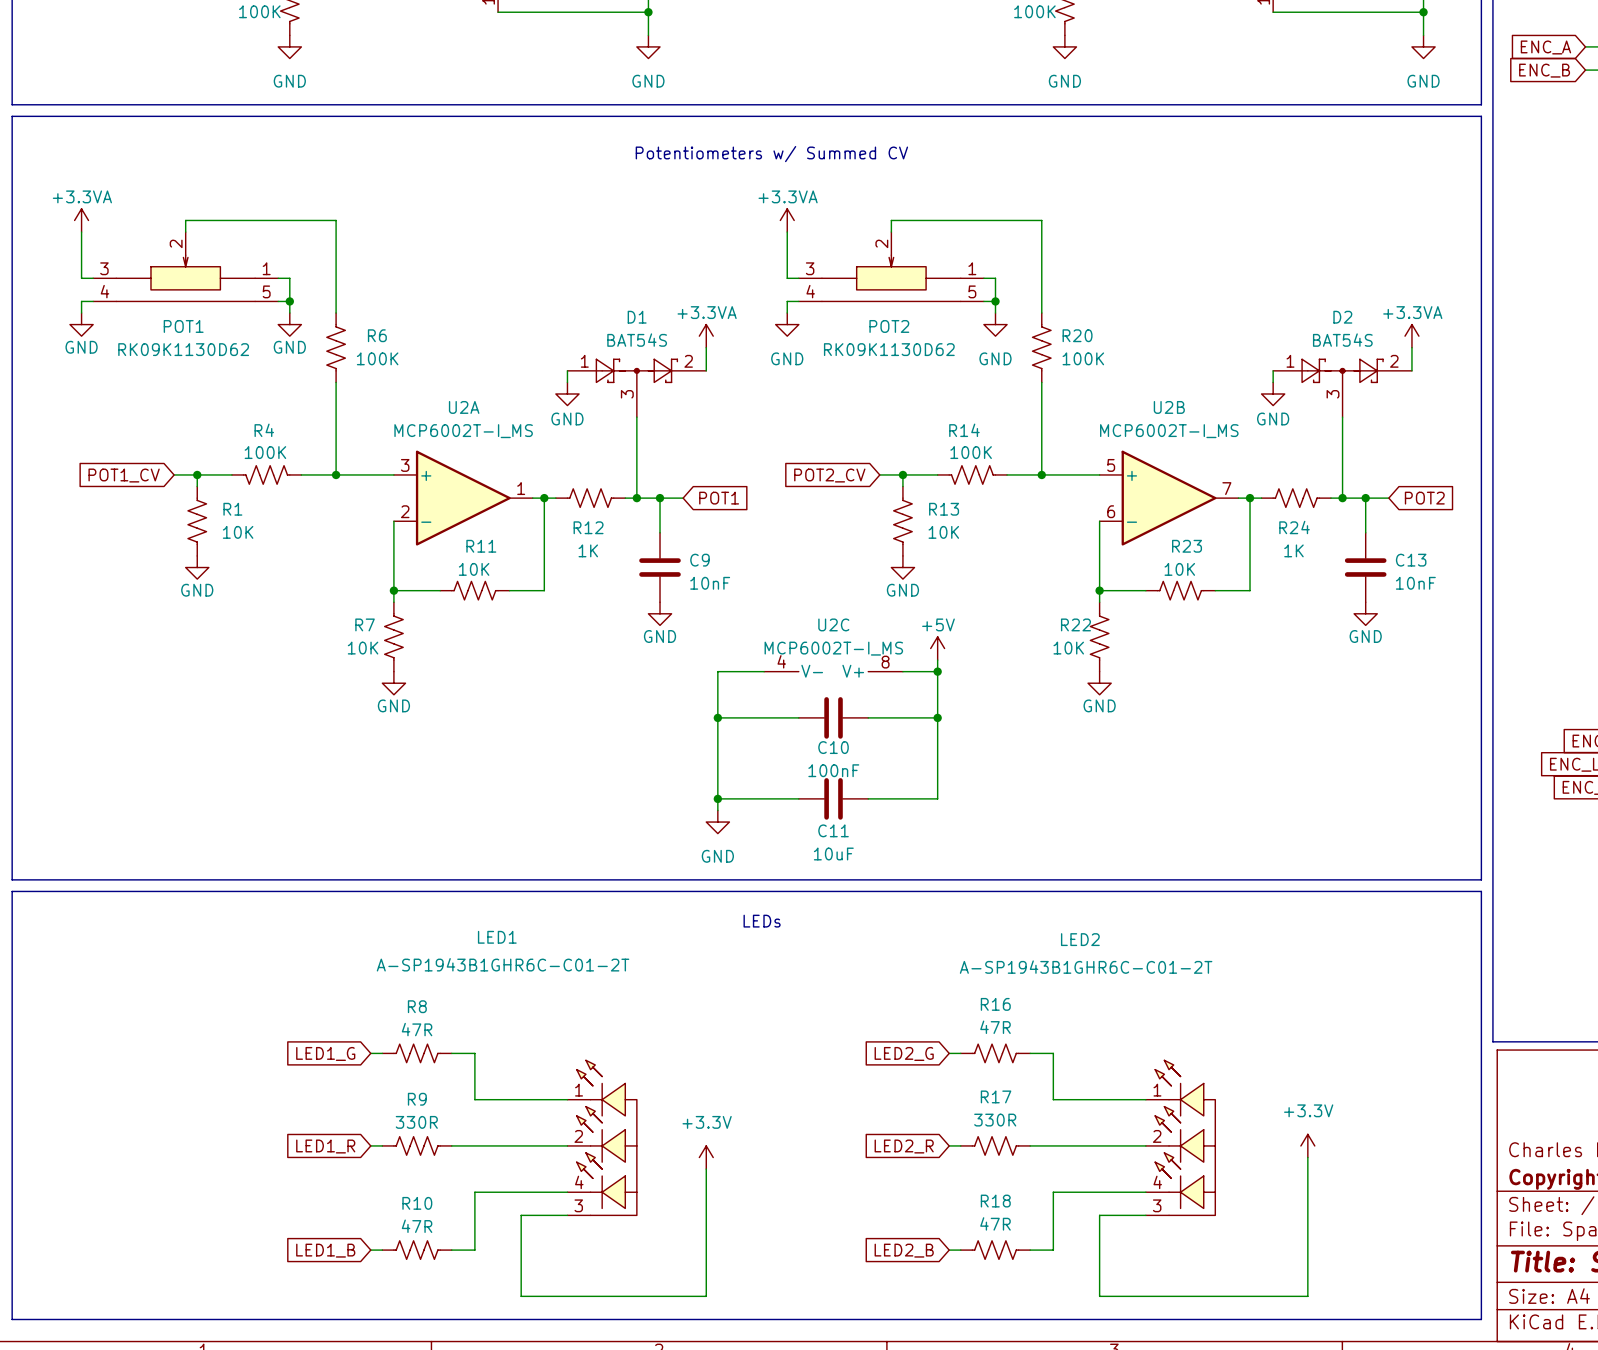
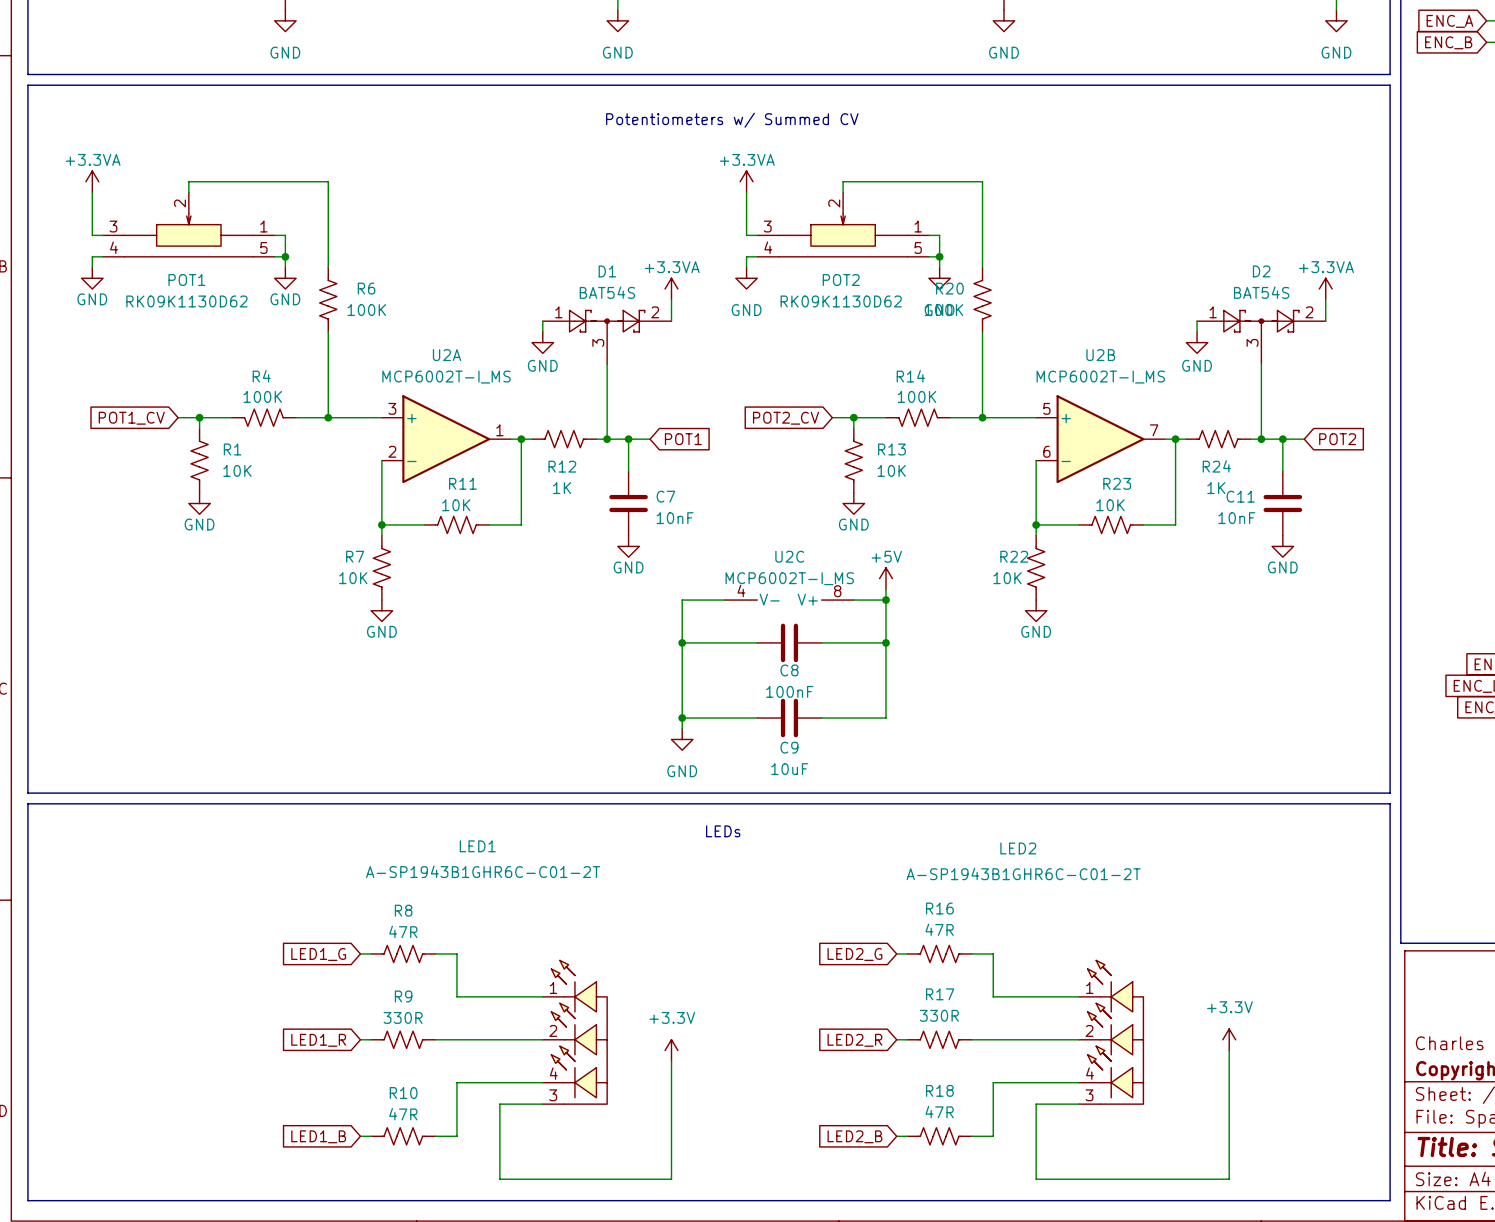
R20 flip: as is (1041, 347) -> left-right (982, 299)
C9 name: C9 (699, 560) -> C7 (665, 496)
C13 name: C13 (1411, 560) -> C11 (1240, 496)
C13 value position: 10nF (1415, 583) -> 10nF (1236, 518)
C10 name: C10 (833, 747) -> C8 (789, 670)
C11 name: C11 (833, 830) -> C9 (789, 747)

